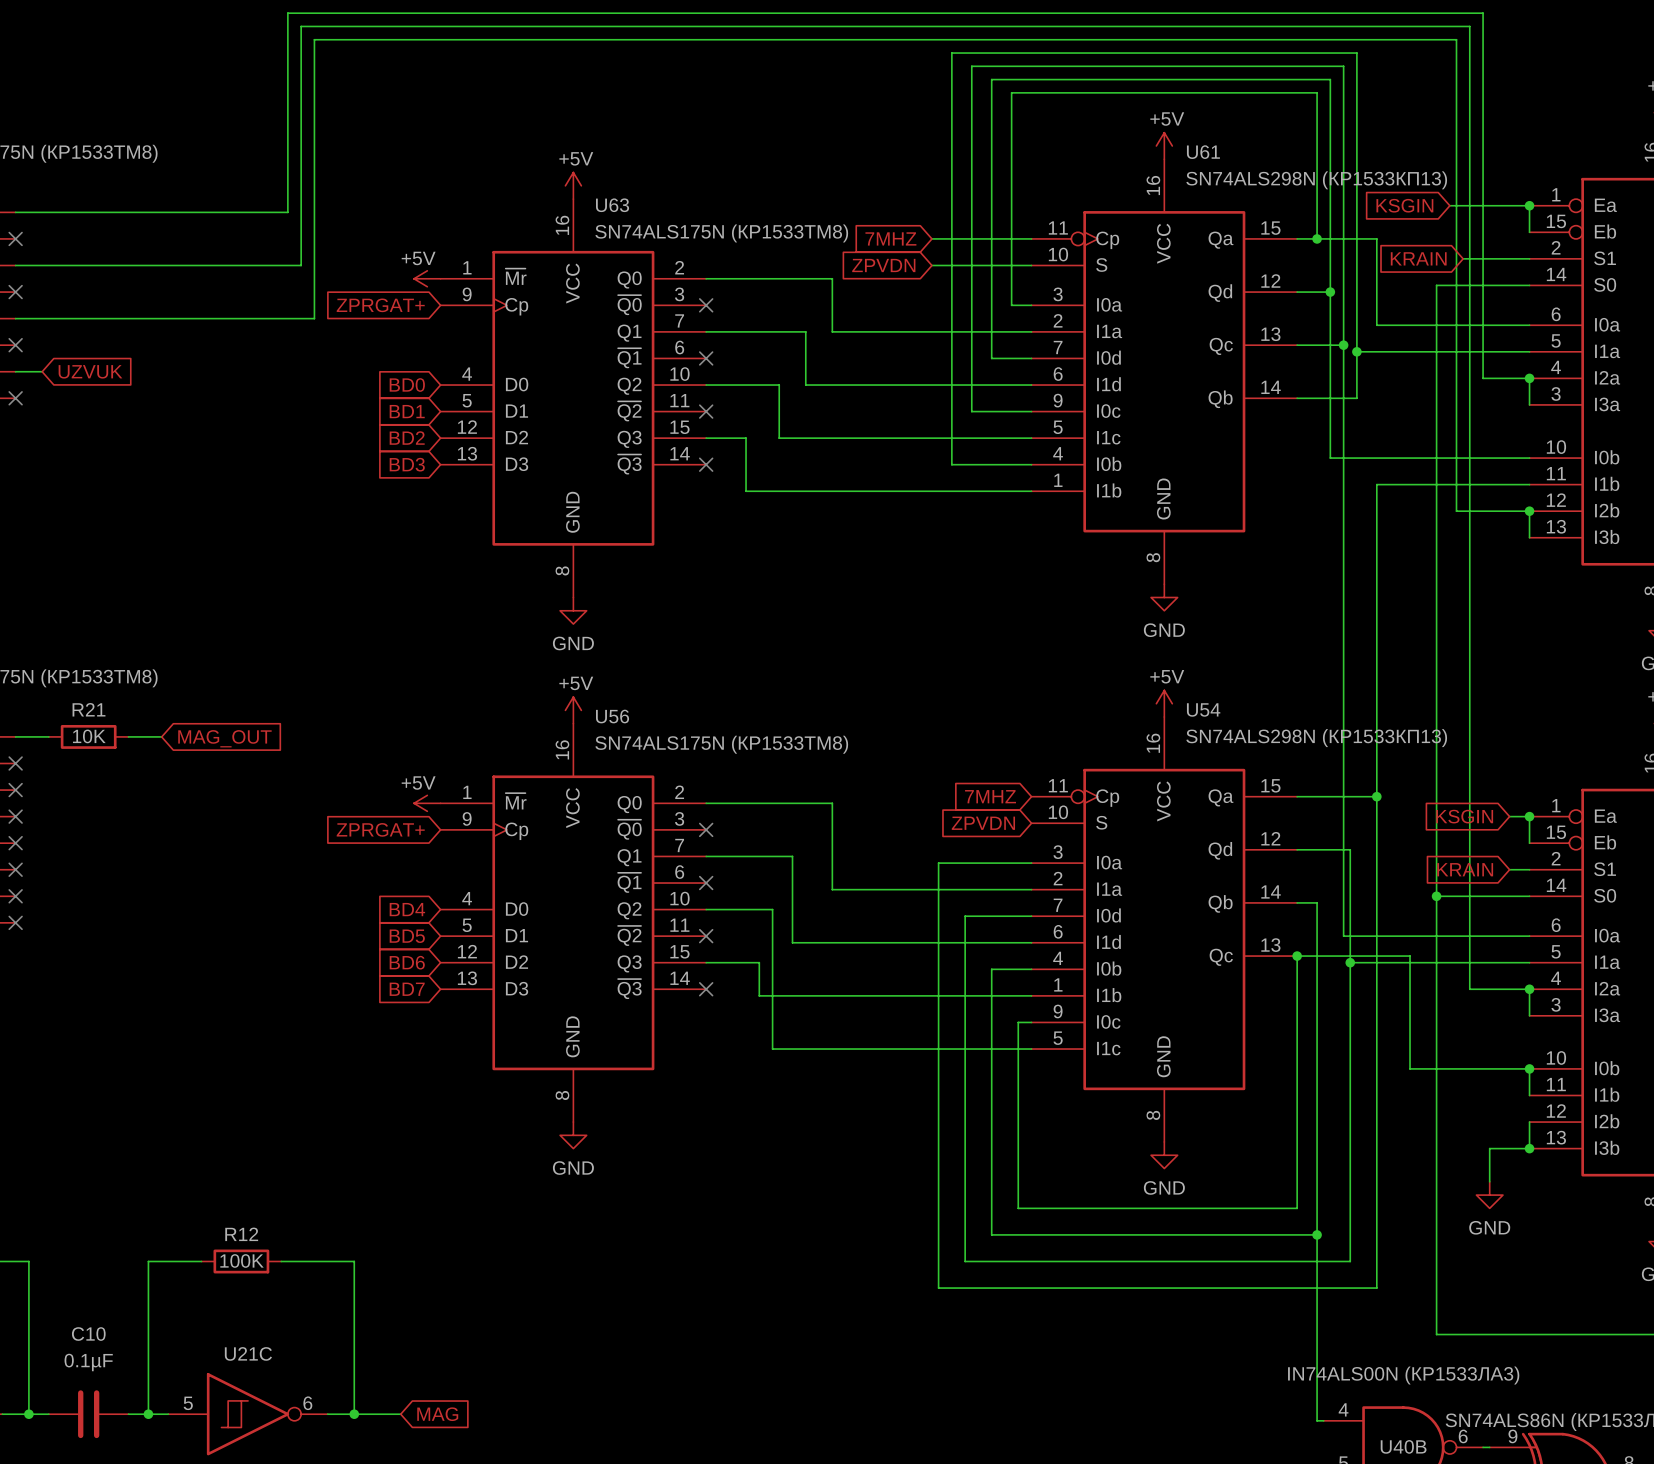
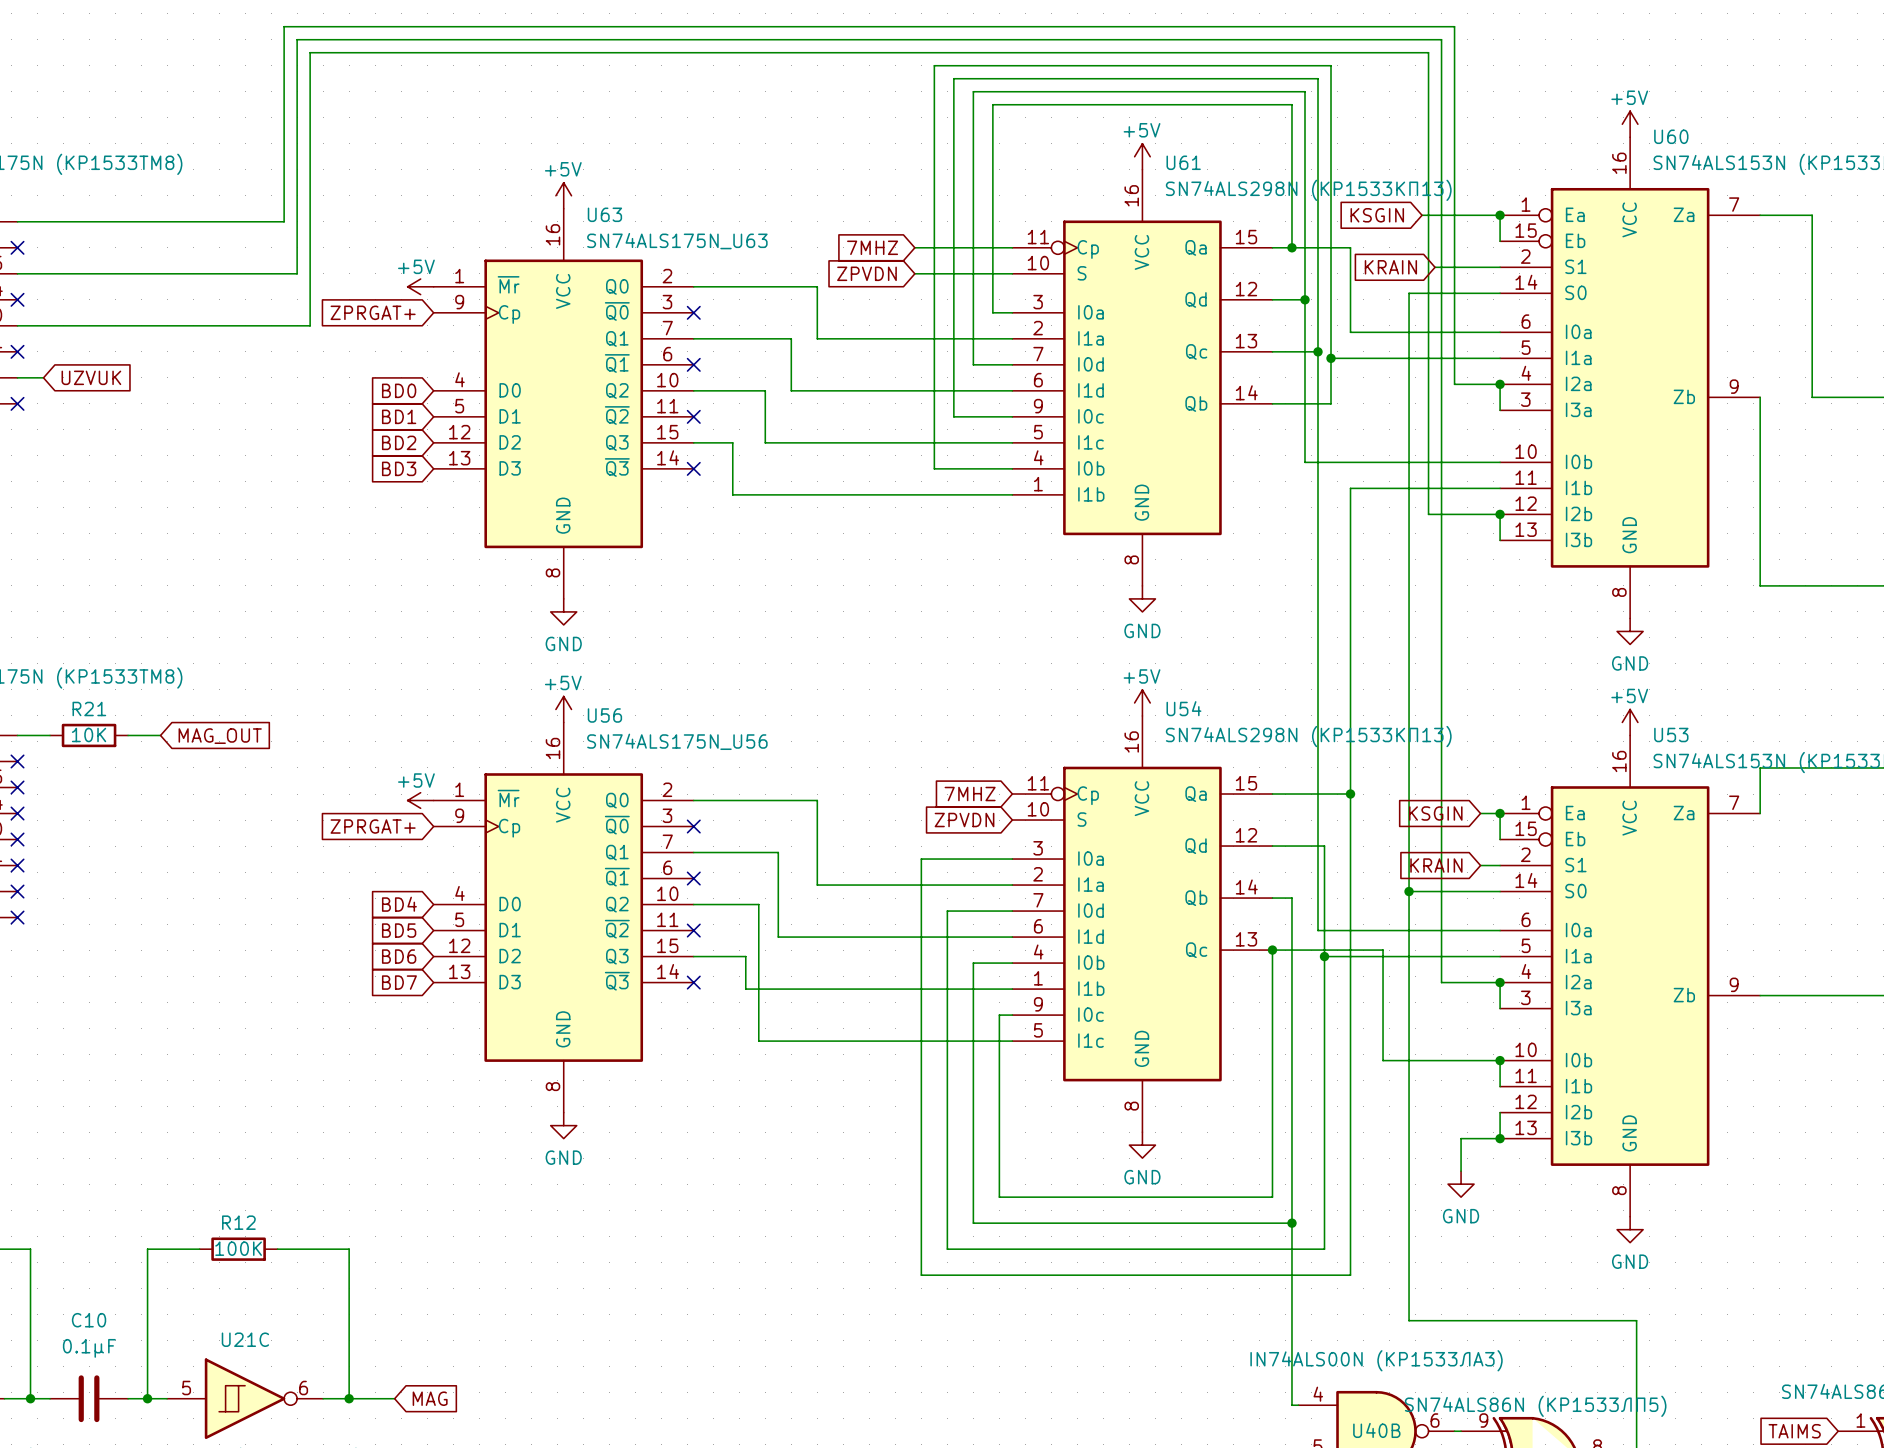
U63 value: SN74ALS175N (КР1533ТМ8) (721, 233) -> SN74ALS175N_U63 (677, 241)
U56 value: SN74ALS175N (КР1533ТМ8) (721, 744) -> SN74ALS175N_U56 (677, 741)

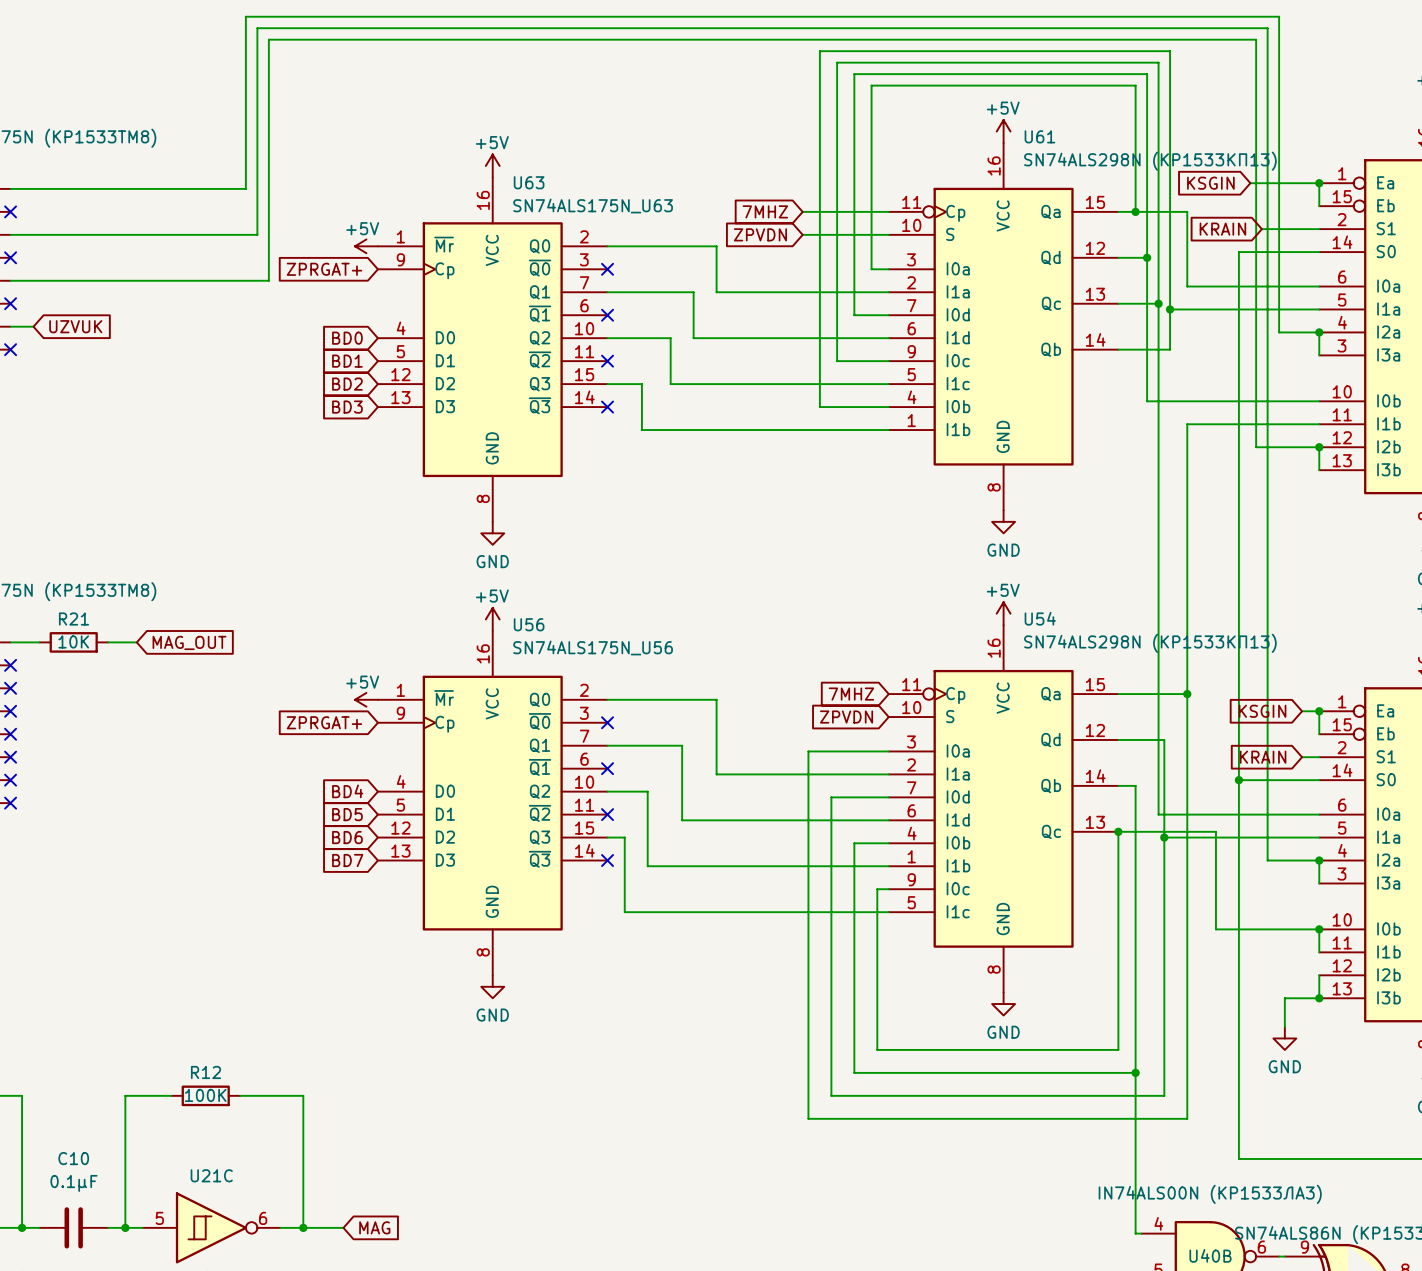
wire: (739, 904) (758, 904) (758, 1041) -> (647, 791) (647, 866) (653, 866)
wire: (713, 956) (745, 956) (745, 989) -> (624, 837) (624, 912) (664, 912)

